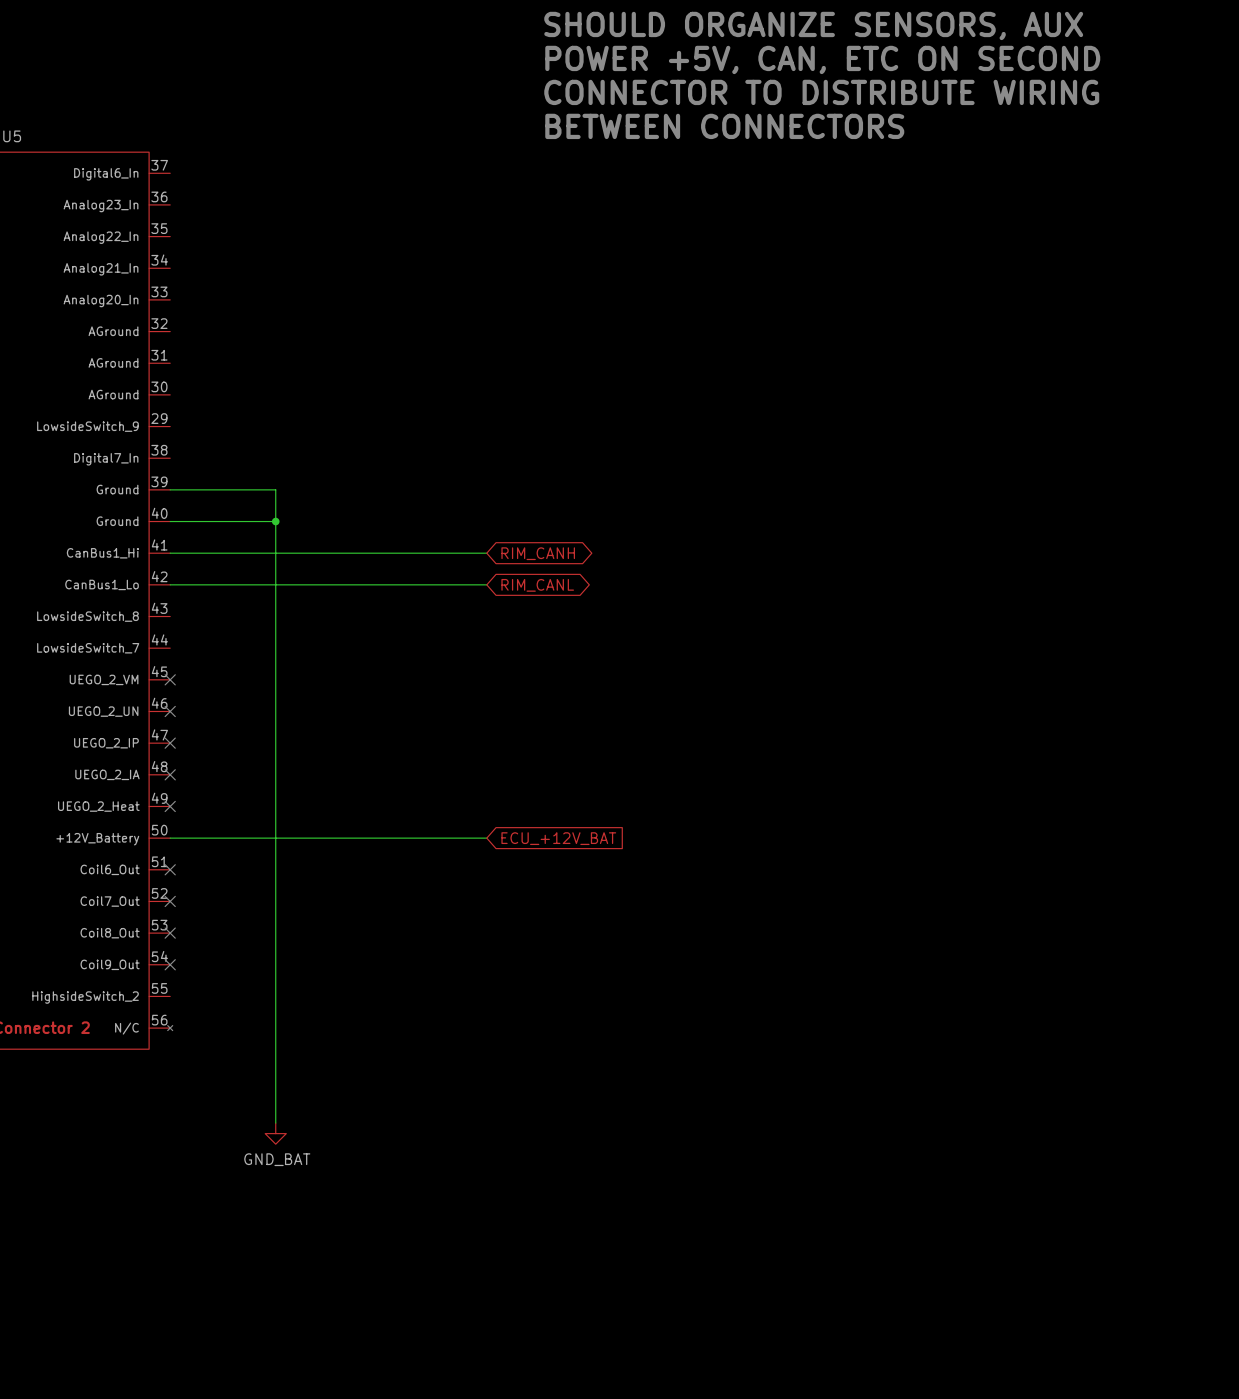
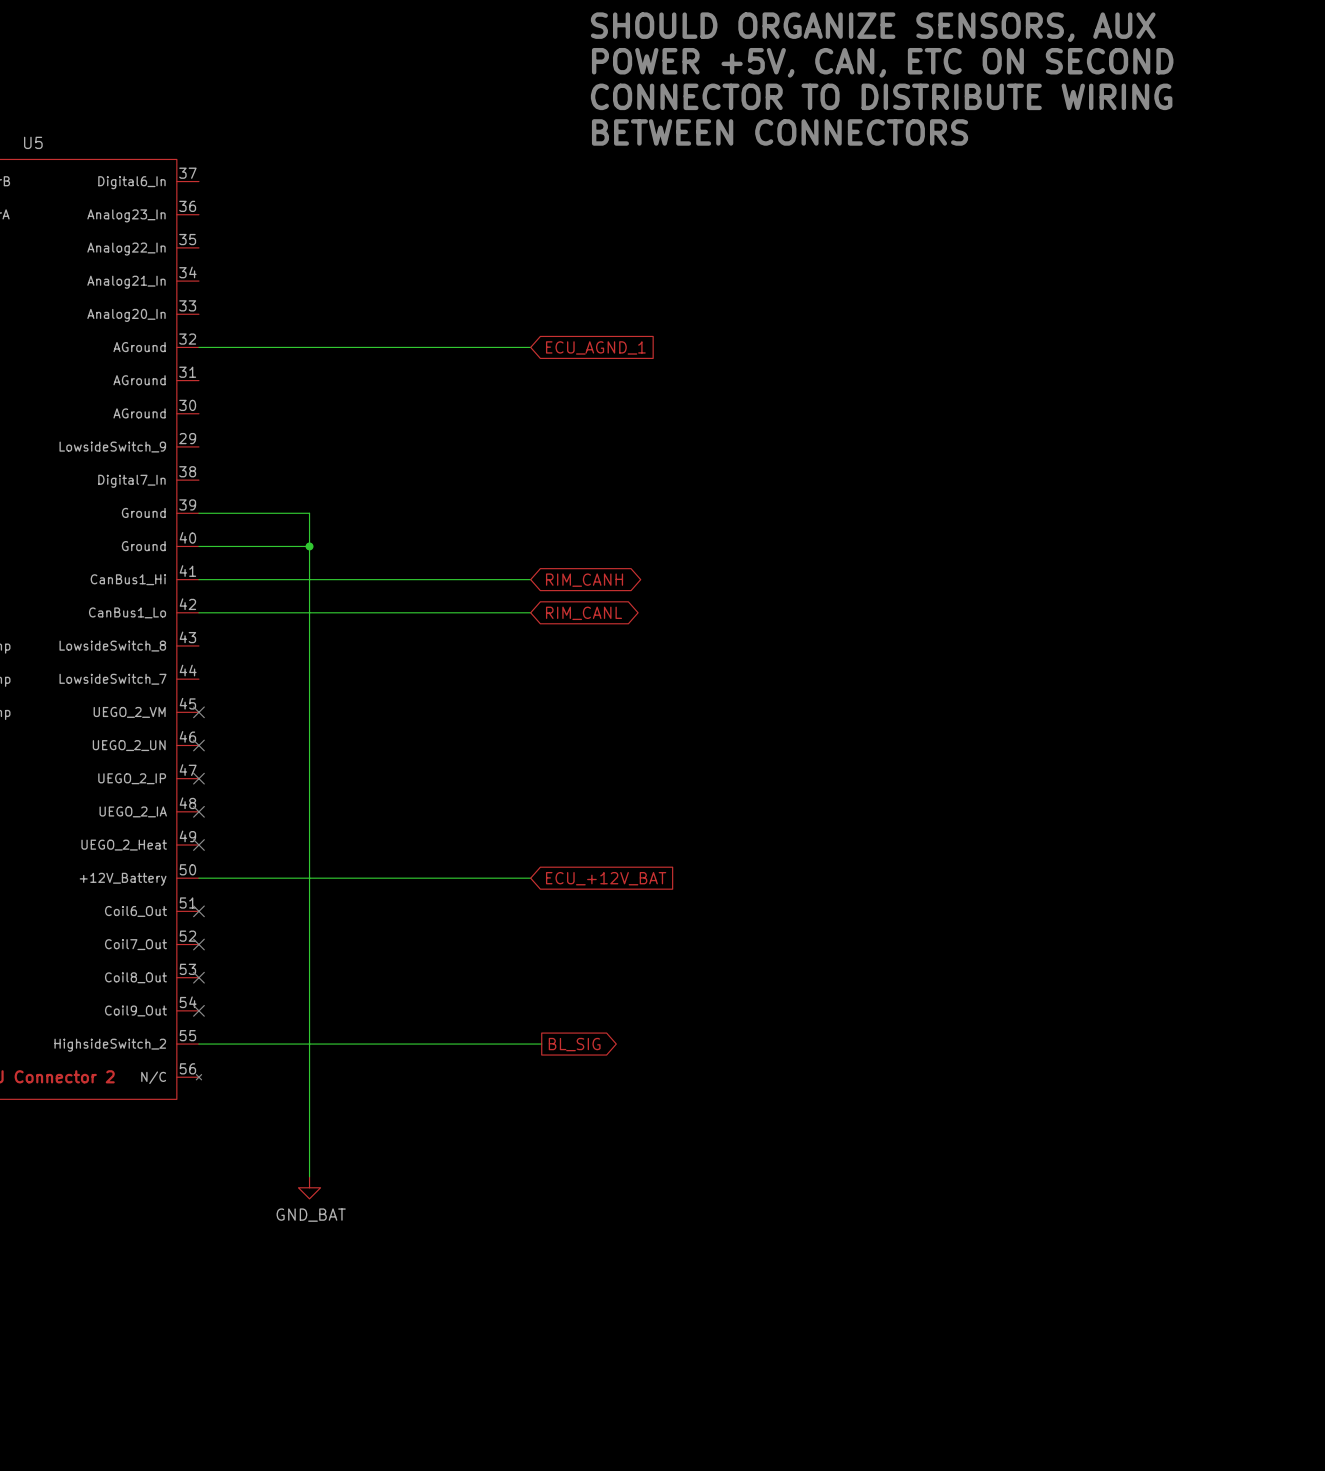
wire: none -> (198, 347) (530, 347)
global label: none -> ECU_AGND_1 (595, 347)
wire: none -> (198, 1044) (541, 1044)
global label: none -> BL_SIG (574, 1044)

